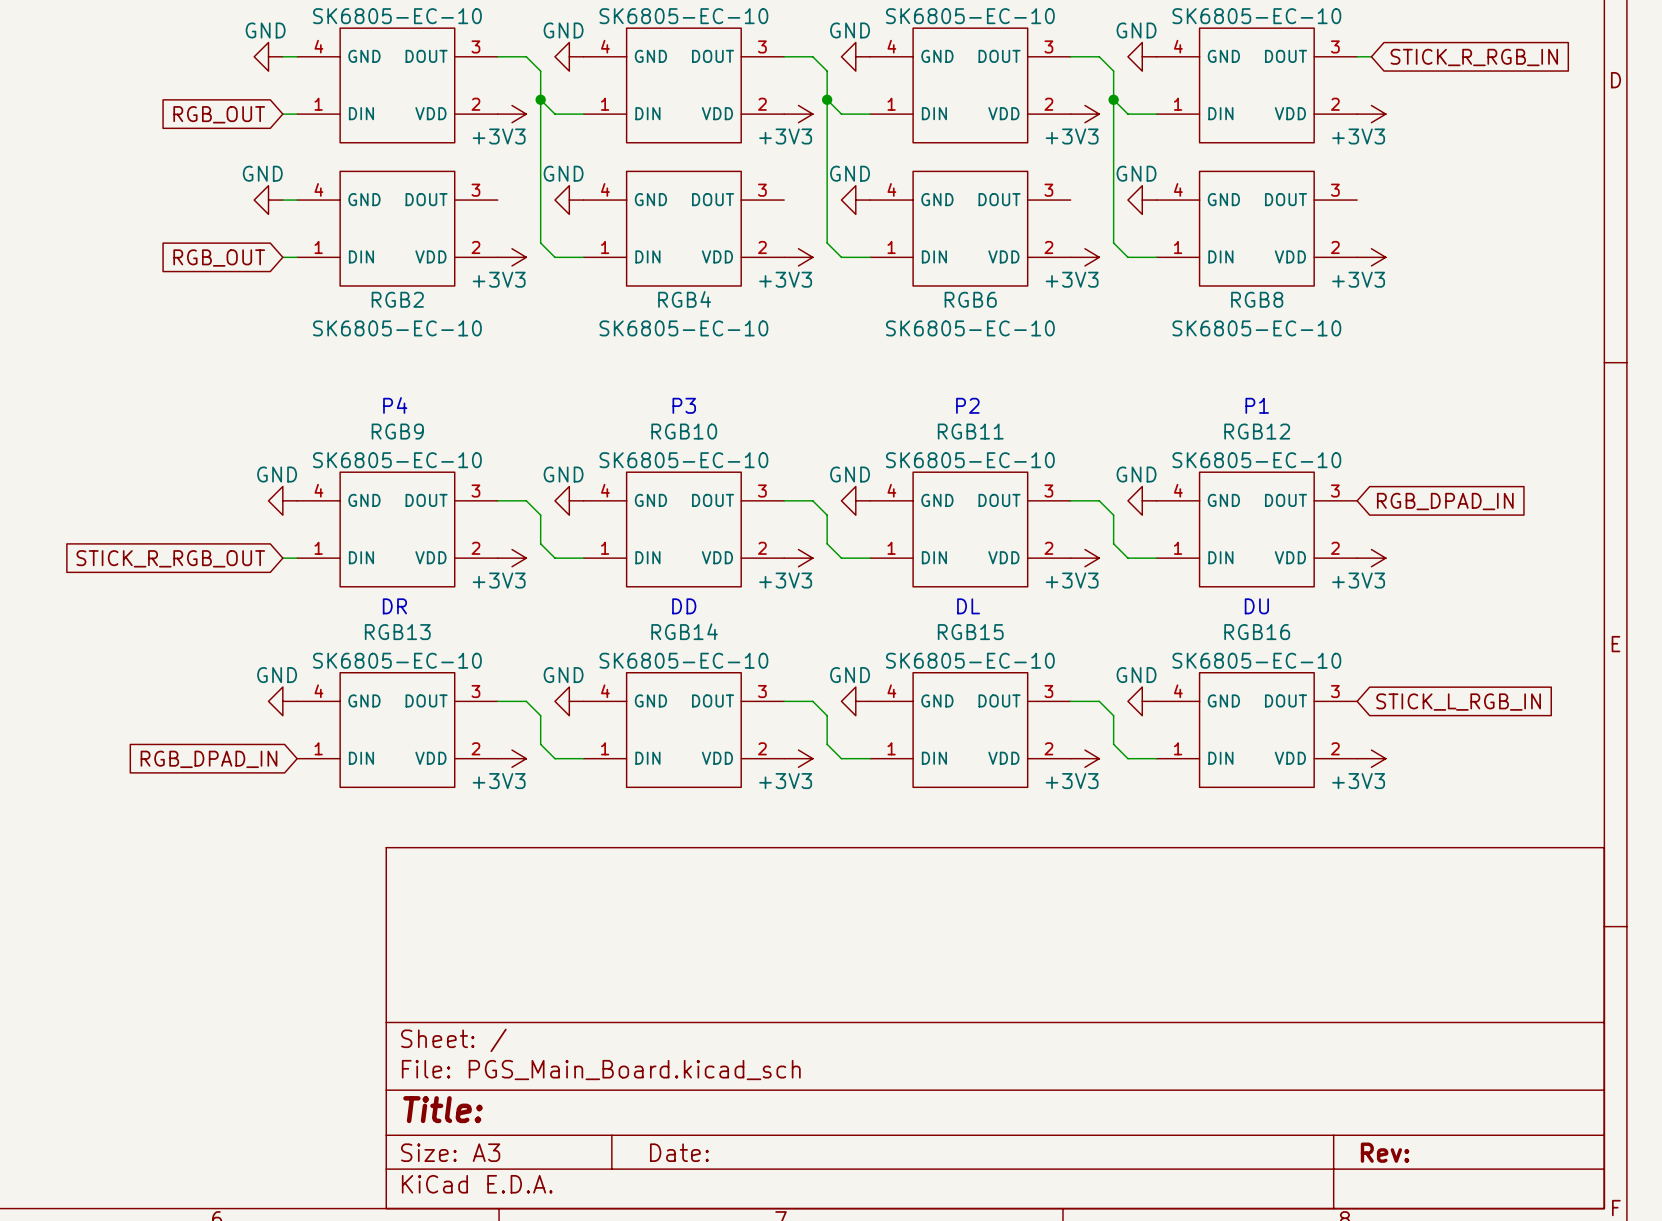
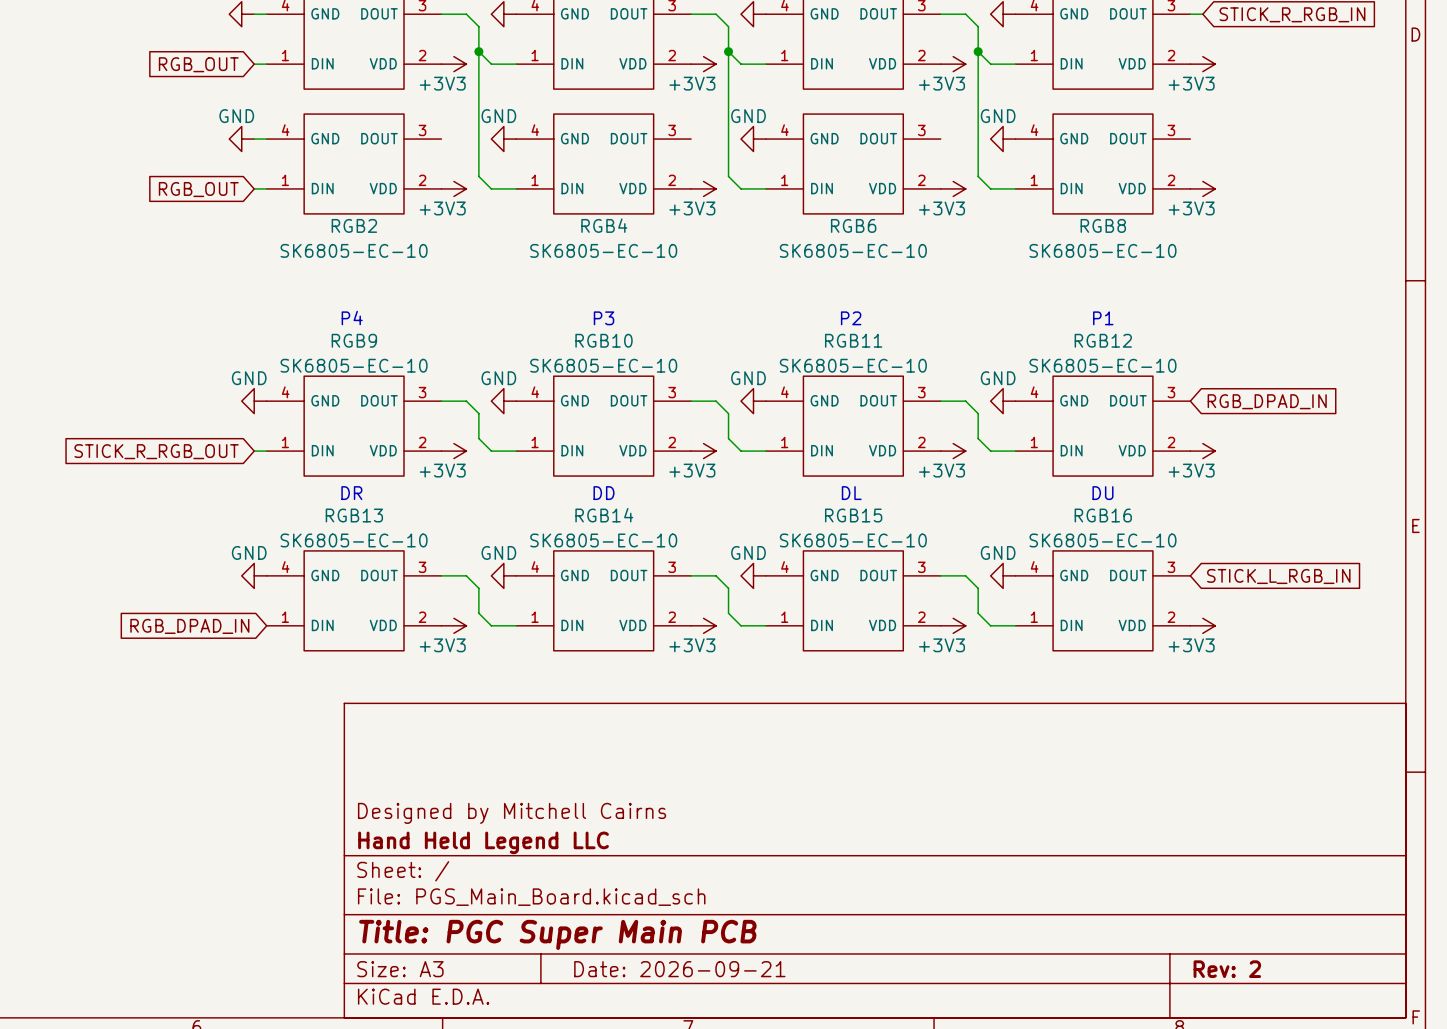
title block: none -> Designed by Mitchell Cairns (512, 813)
title block: none -> Hand Held Legend LLC (483, 842)
title block: Title: (443, 1109) -> Title: PGC Super Main PCB (557, 934)
title block: Date: (679, 1152) -> Date: 2026-09-21 (679, 969)
title block: Rev: (1385, 1152) -> Rev: 2 (1227, 969)

